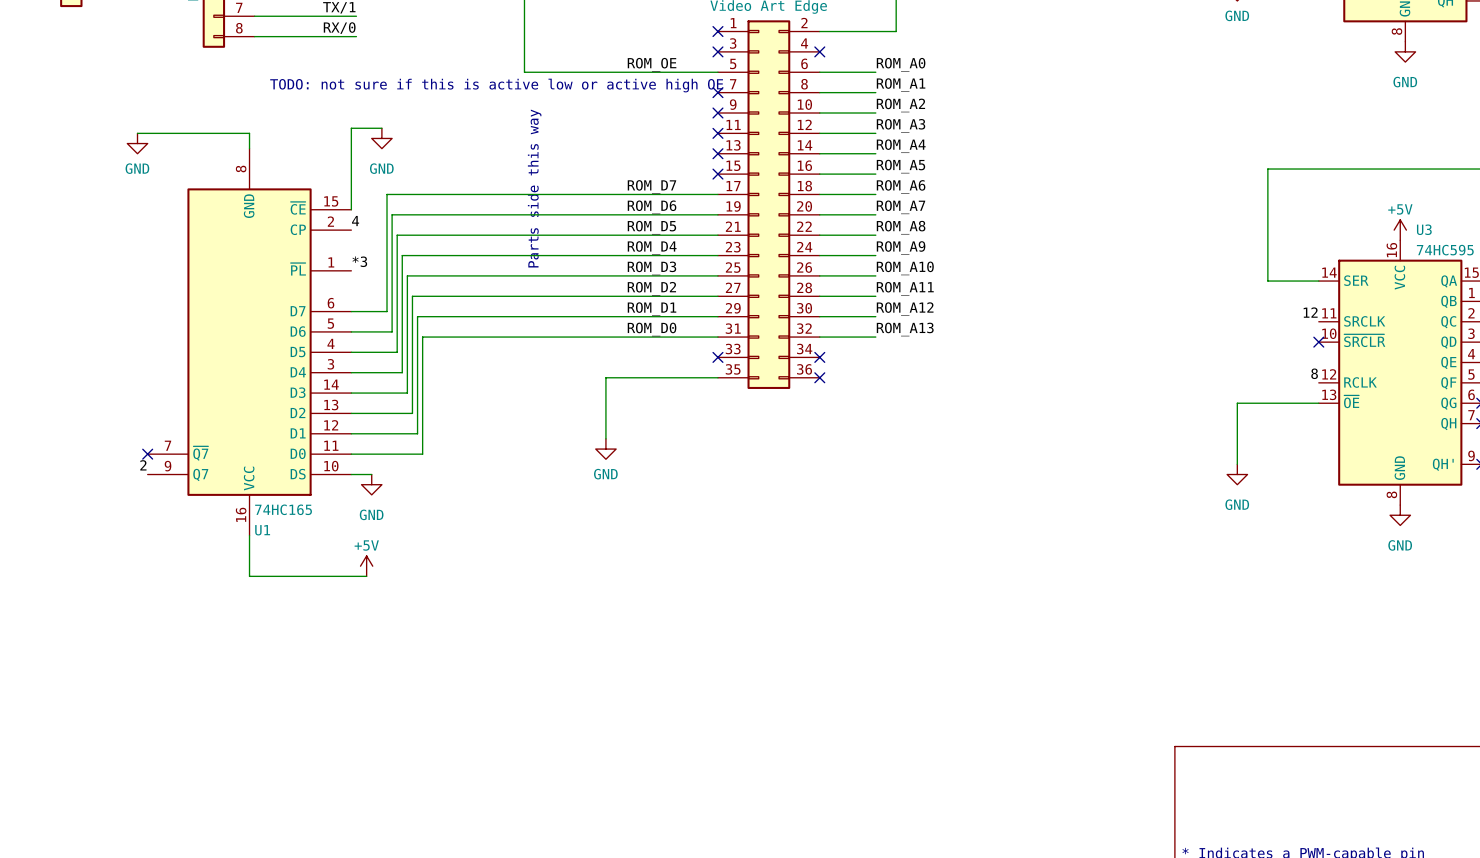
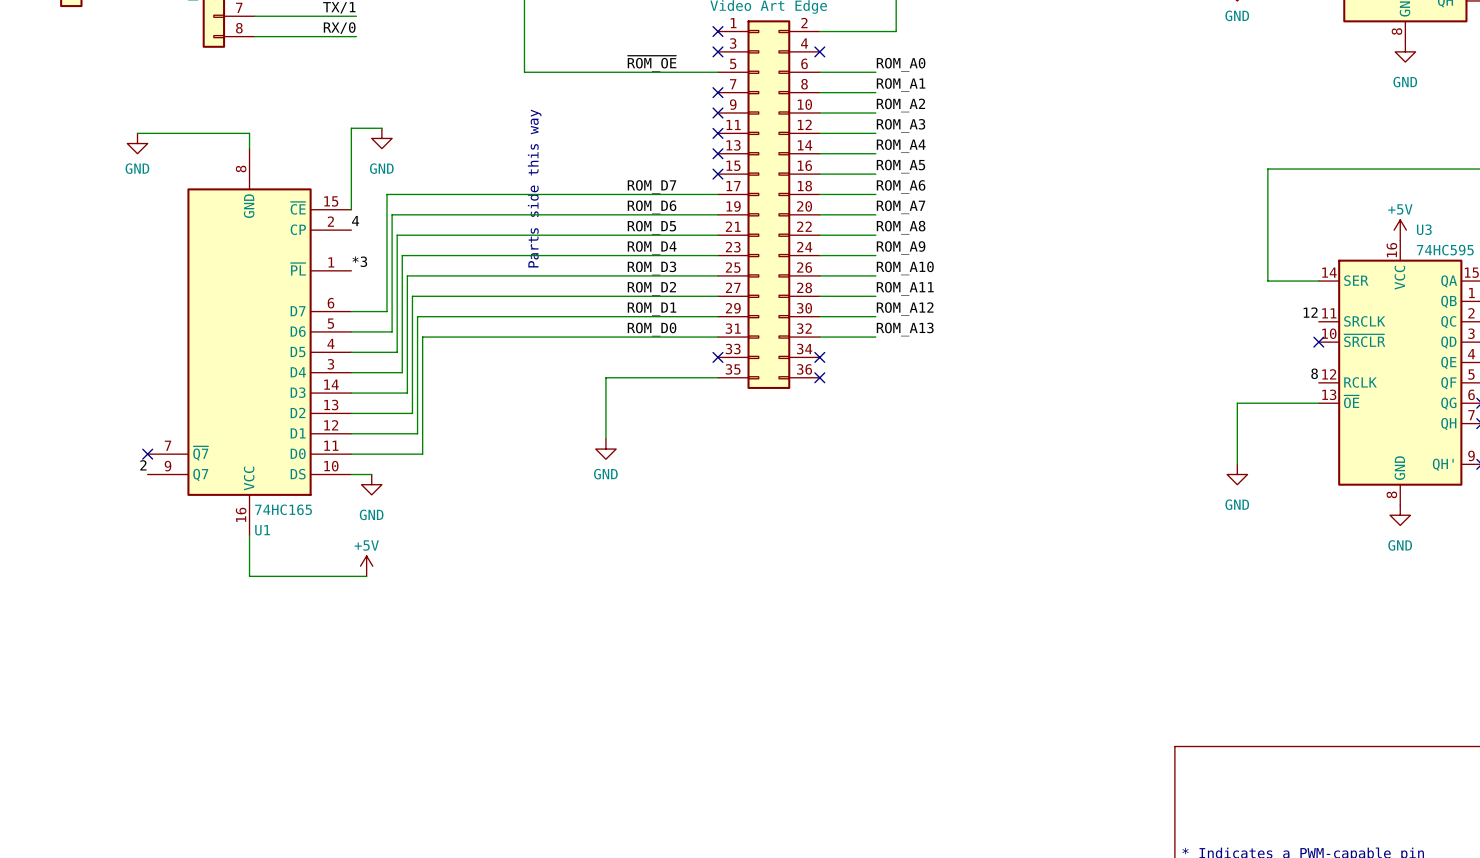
label: ROM_OE (652, 64) -> ~{ROM_OE} (652, 63)
text: TODO: not sure if this is active low or active high OE (496, 85) -> none

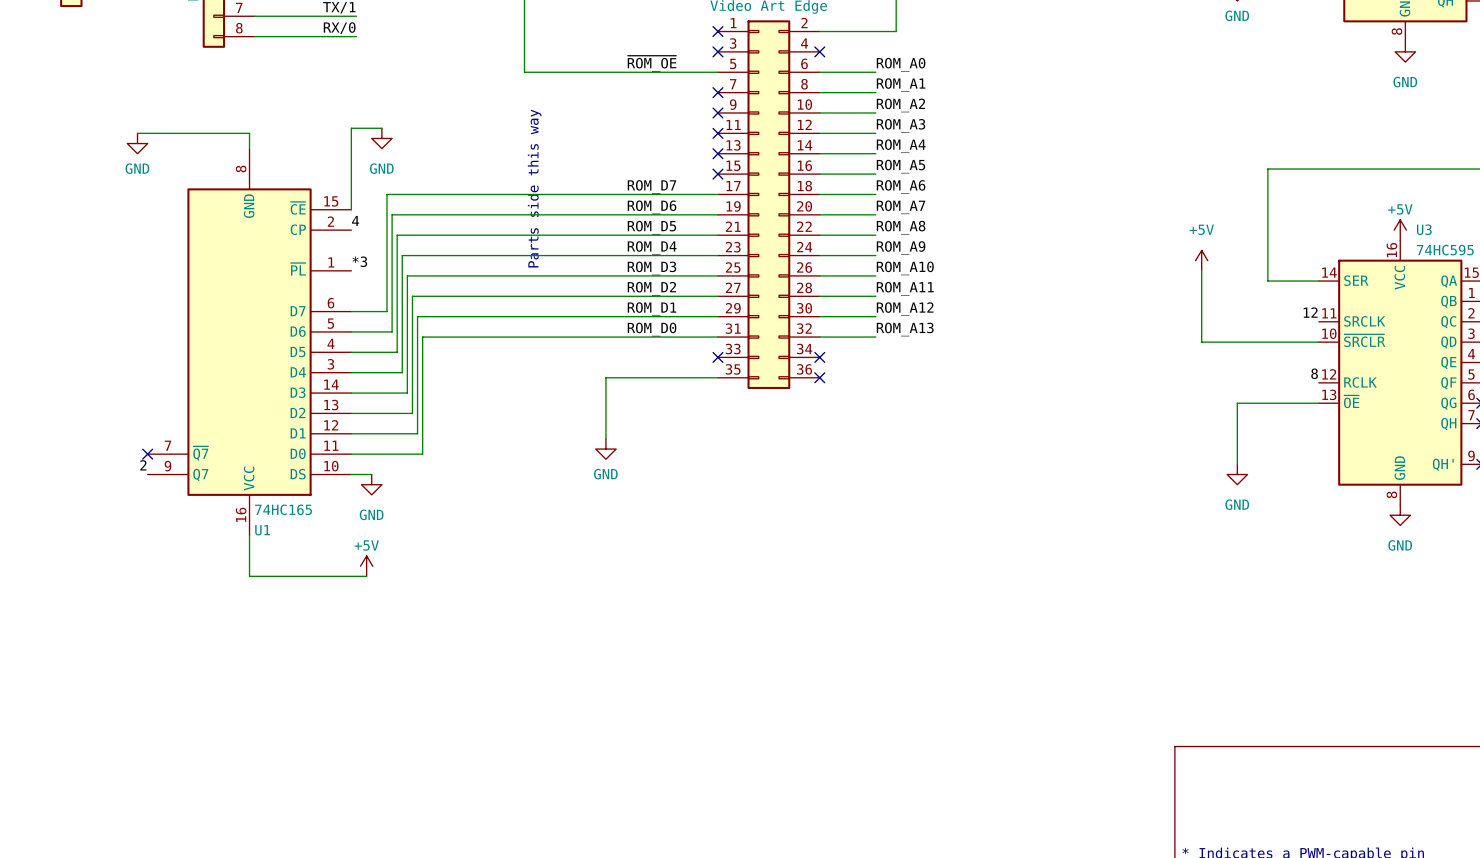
power symbol: none -> +5V (1201, 260)
wire: none -> (1201, 270) (1201, 342) (1318, 342)
no-connect mark: (1318, 342) -> none

